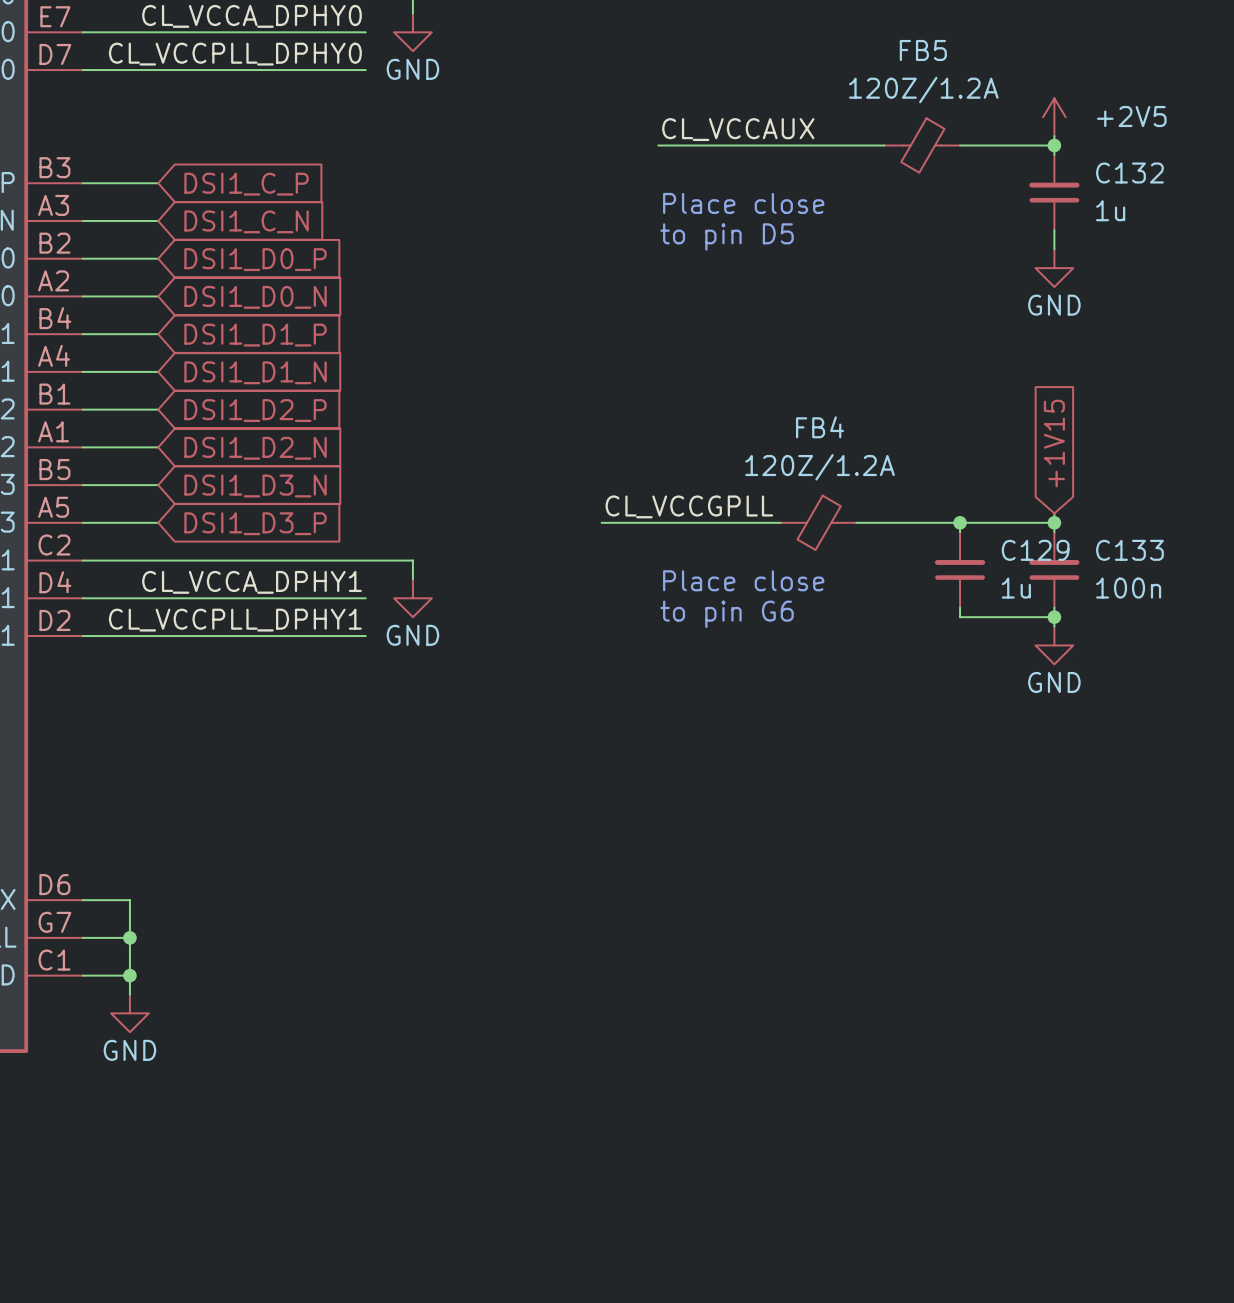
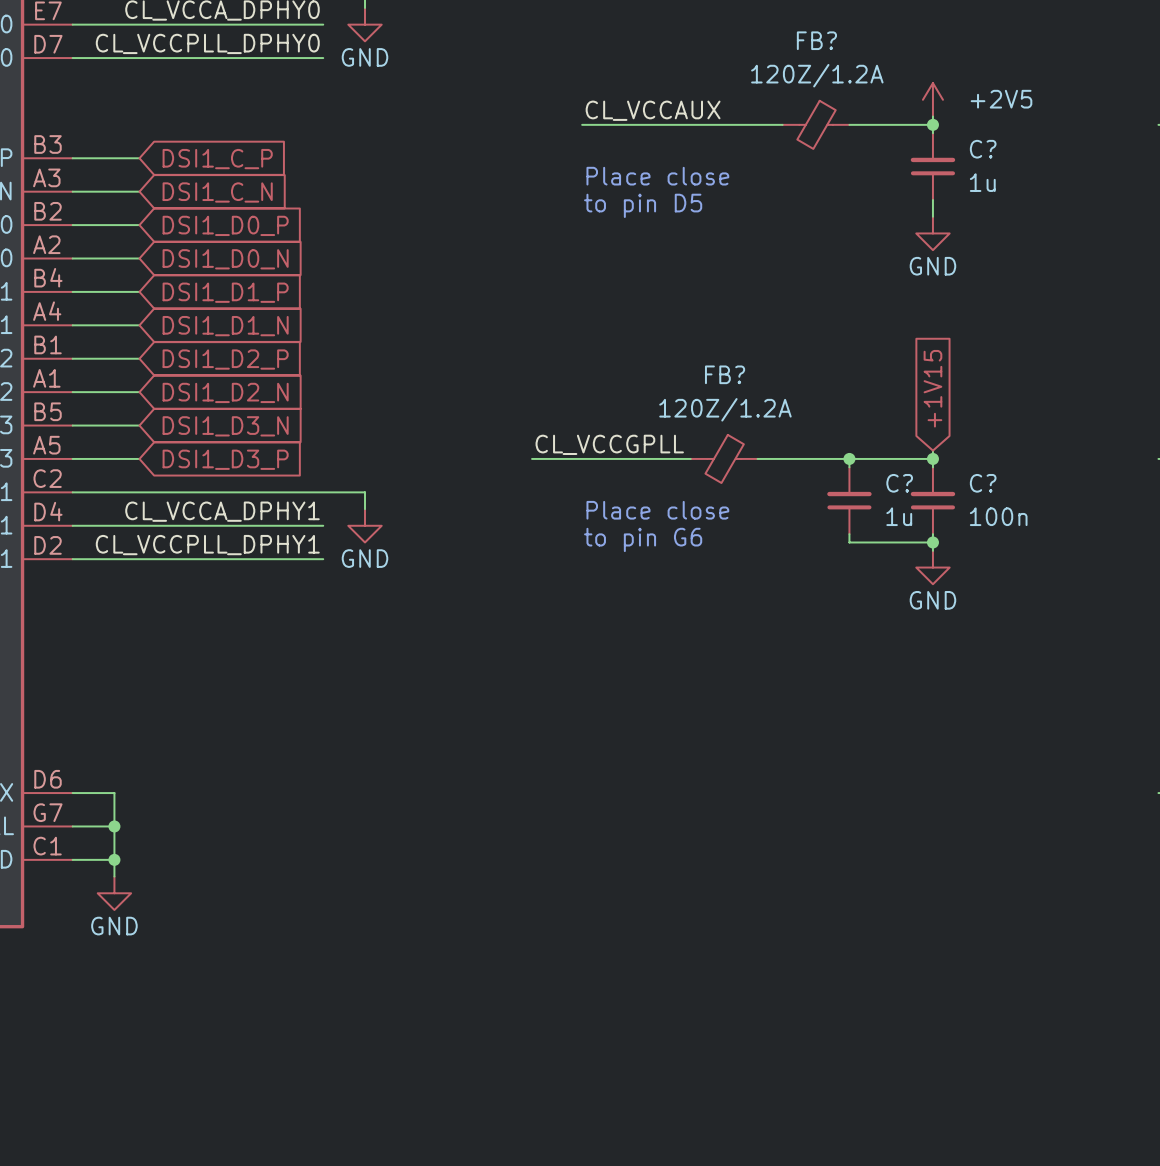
FB5 name: FB5 (923, 50) -> FB? (816, 40)
C132 name: C132 (1129, 173) -> C? (983, 149)
FB4 name: FB4 (820, 427) -> FB? (725, 374)
C129 name: C129 (1035, 550) -> C? (899, 483)
C133 name: C133 (1129, 550) -> C? (983, 483)

